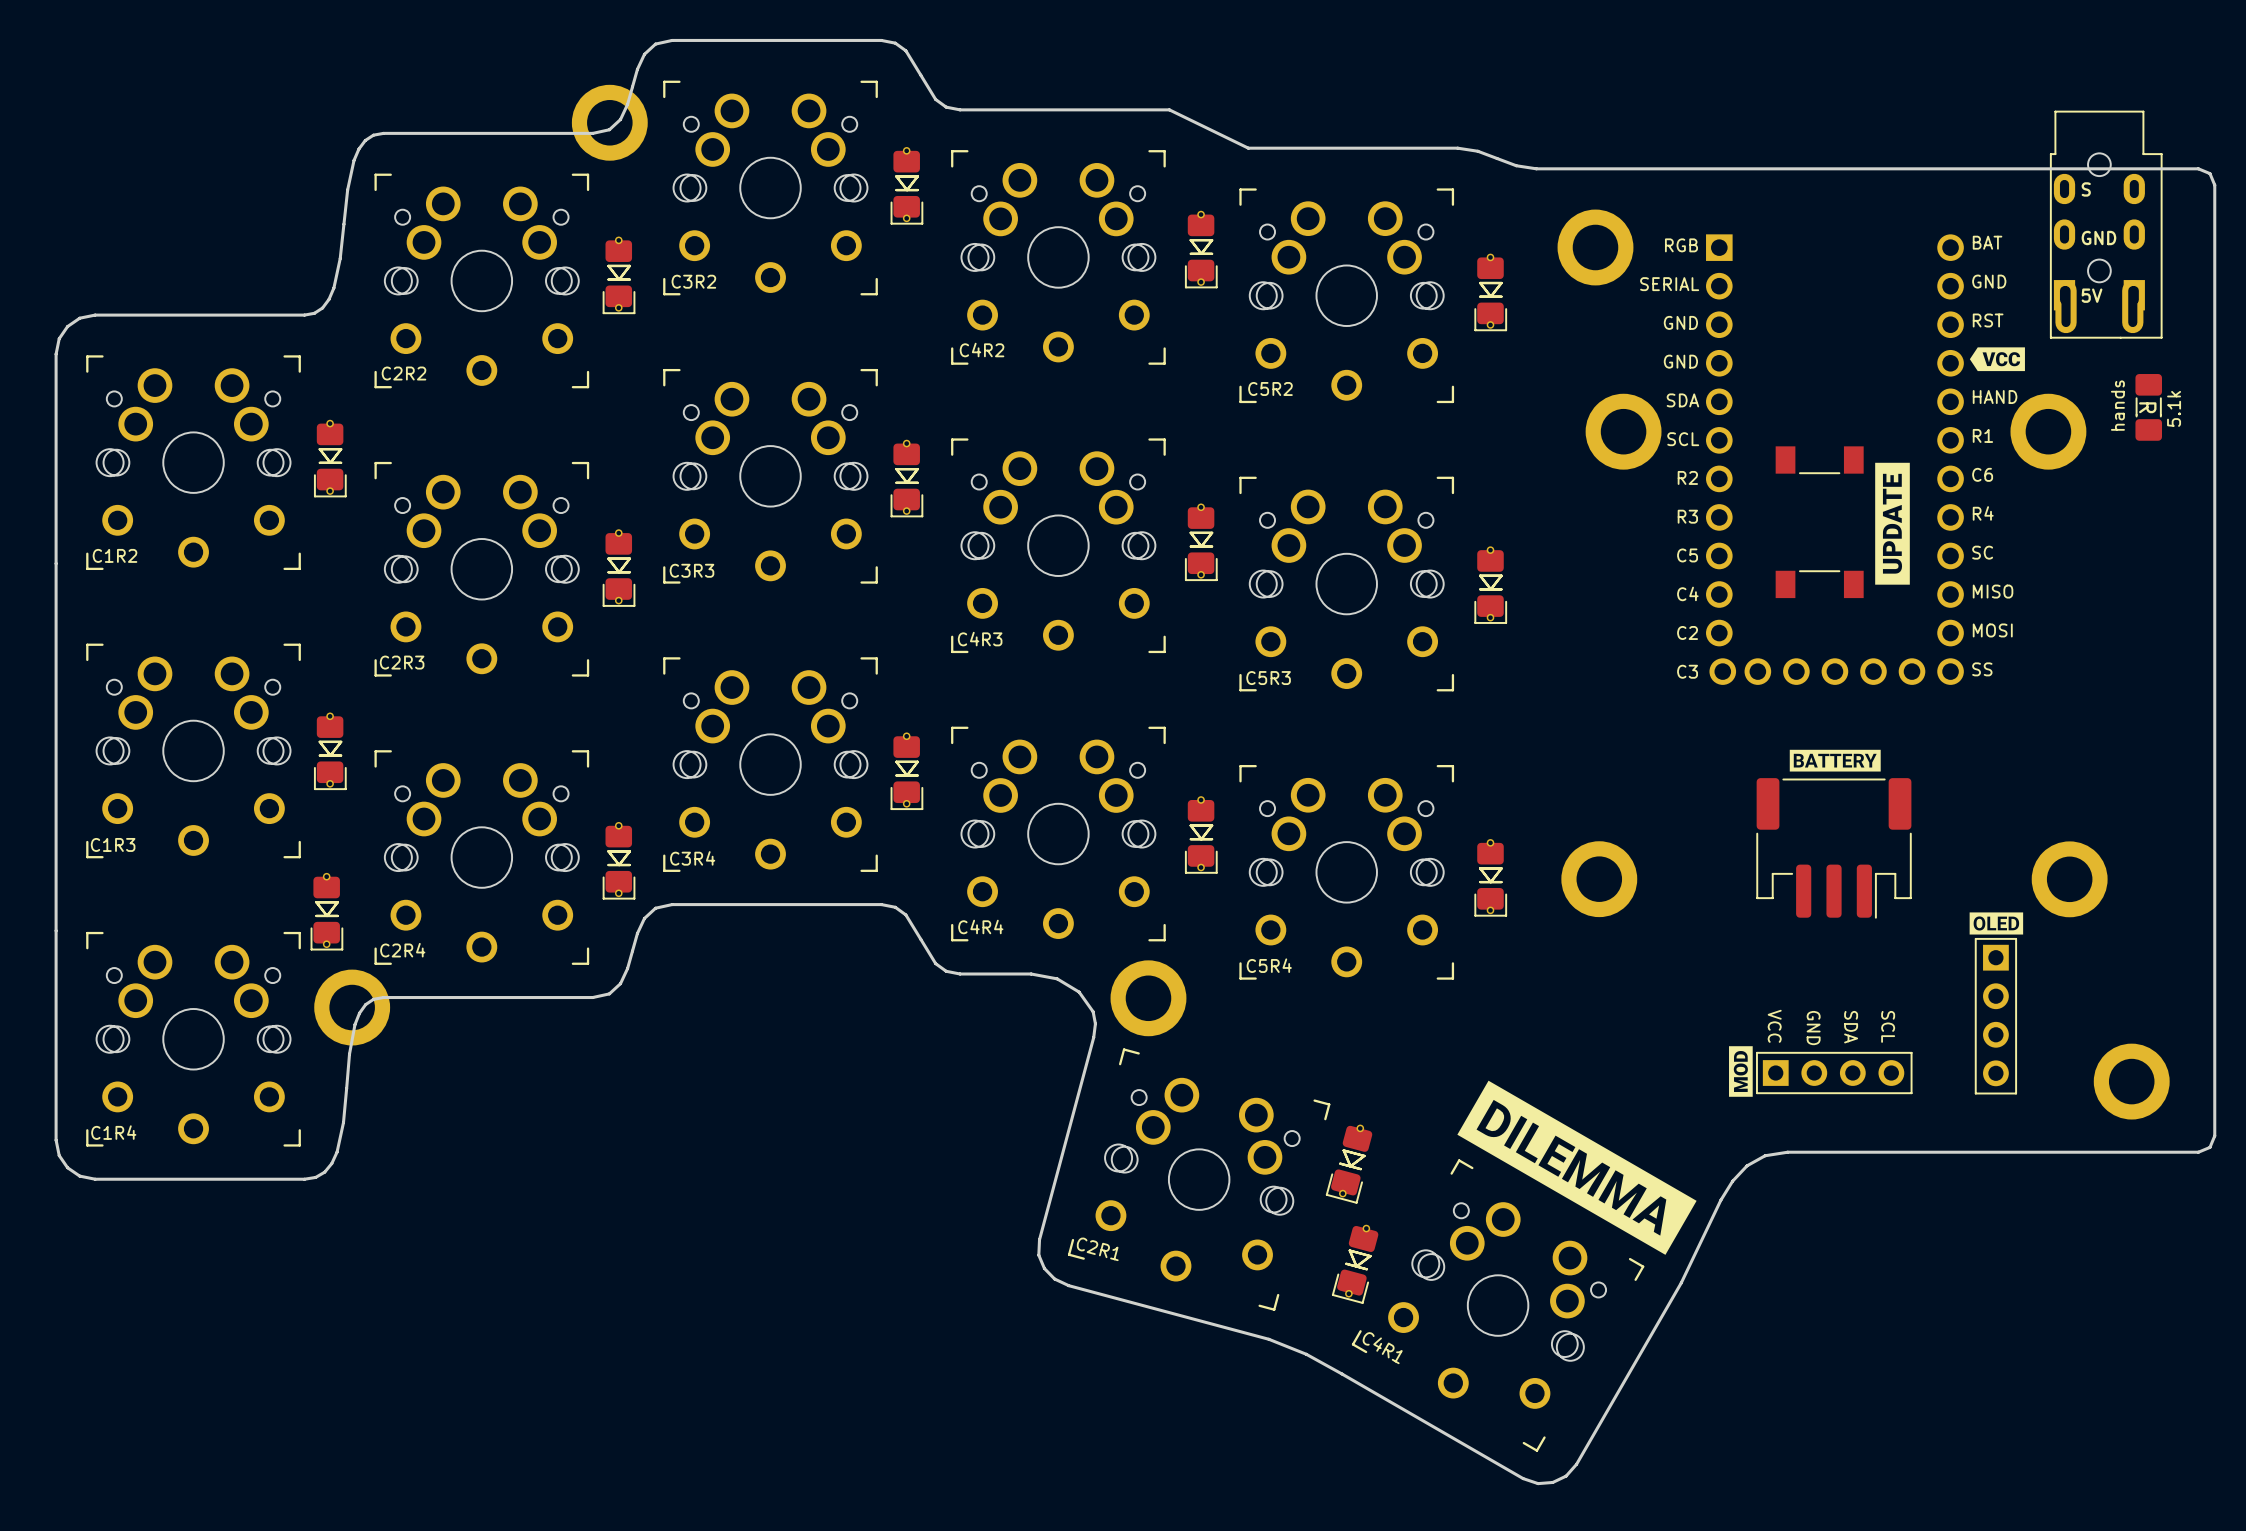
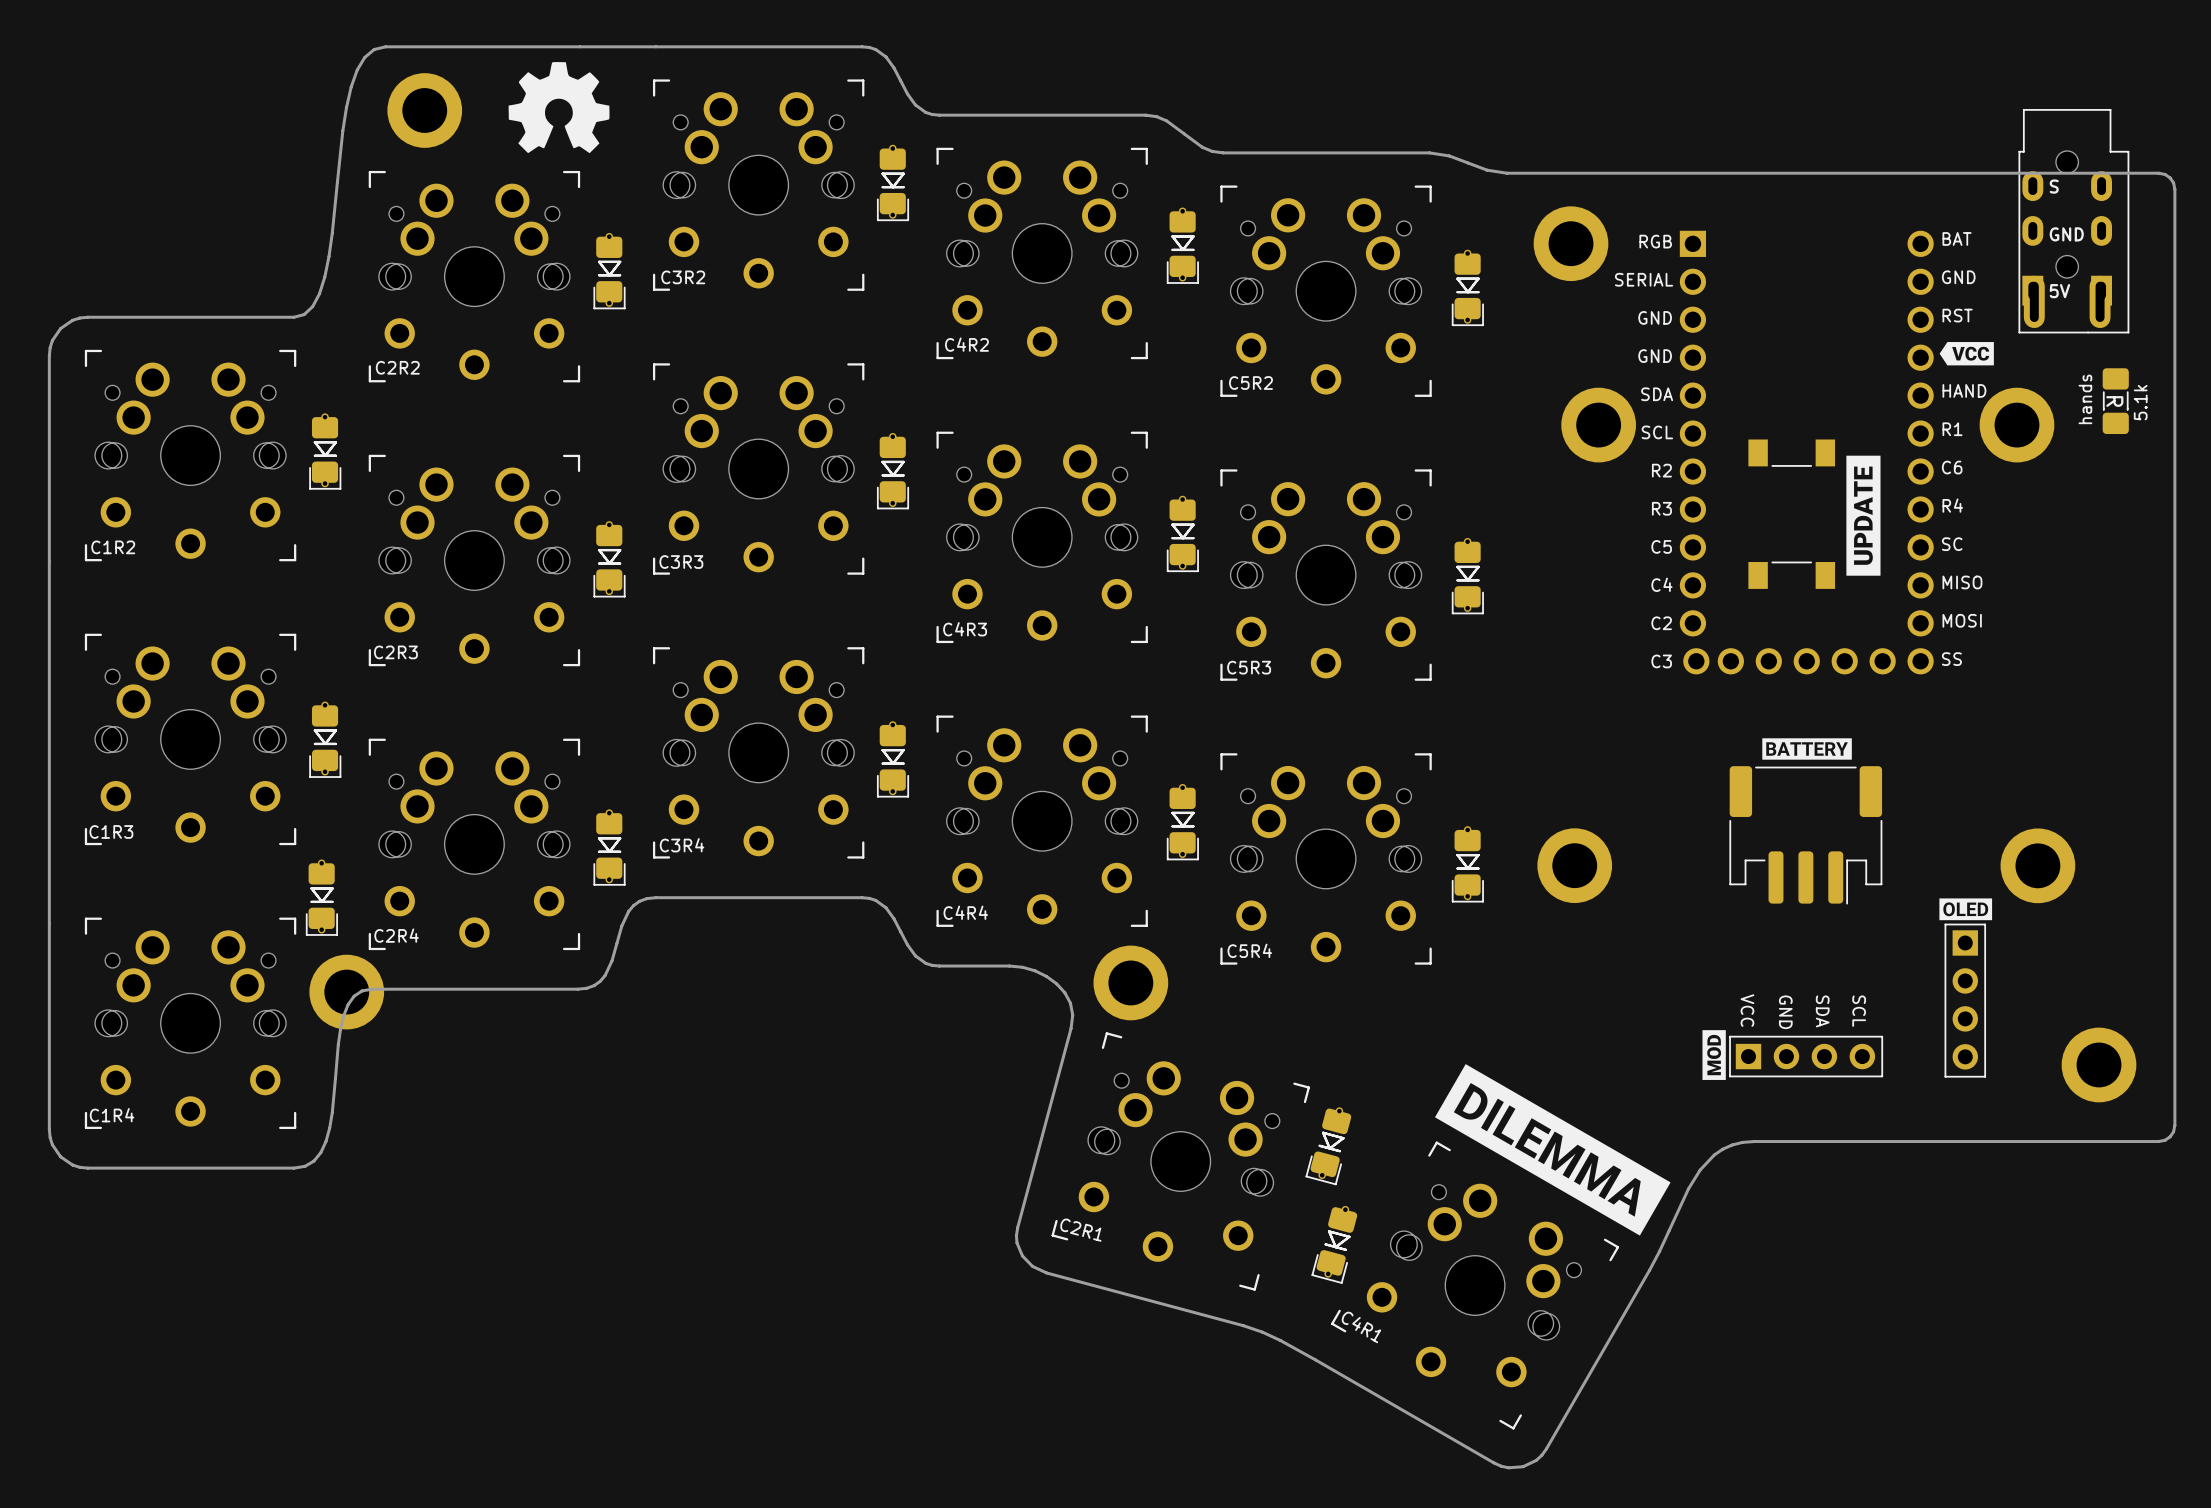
board edge: (672, 40) (655, 44) (644, 54) (637, 69) (627, 104) (620, 119) (609, 129) (592, 133) (383, 133) (373, 135) (365, 140) (354, 160) (347, 189) (340, 258) (333, 288) (322, 307) (314, 313) (304, 315) (95, 315) (79, 318) (67, 326) (59, 338) (56, 354) (56, 1140) (59, 1155) (67, 1167) (79, 1176) (95, 1179) (304, 1179) (315, 1177) (324, 1172) (331, 1163) (337, 1152) (343, 1122) (349, 1054) (354, 1024) (365, 1004) (373, 999) (383, 997) (592, 997) (609, 993) (620, 983) (627, 968) (637, 933) (644, 918) (655, 908) (672, 904) (881, 904) (895, 907) (905, 914) (935, 963) (946, 971) (960, 974) (1031, 974) (1057, 978) (1079, 992) (1093, 1011) (1095, 1023) (1093, 1037) (1039, 1239) (1038, 1255) (1044, 1268) (1054, 1279) (1068, 1285) (1268, 1339) (1306, 1354) (1523, 1478) (1538, 1483) (1552, 1482) (1566, 1476) (1576, 1464) (1681, 1282) (1720, 1200) (1732, 1181) (1747, 1165) (1765, 1155) (1787, 1152) (2198, 1152) (2209, 1147) (2214, 1135) (2214, 185) (2209, 173) (2198, 168) (1536, 168) (1516, 165) (1477, 151) (1457, 148) (1248, 148) (1169, 109) (960, 109) (946, 107) (935, 99) (905, 50) (895, 43) (881, 40) (672, 40) -> (385, 46) (374, 49) (364, 57) (357, 70) (351, 87) (342, 130) (332, 233) (324, 276) (312, 306) (304, 314) (294, 317) (79, 318) (60, 328) (50, 347) (49, 1129) (52, 1144) (60, 1156) (72, 1165) (87, 1168) (294, 1168) (305, 1166) (313, 1161) (326, 1141) (332, 1112) (338, 1044) (343, 1015) (354, 996) (361, 990) (371, 989) (586, 988) (594, 985) (605, 975) (628, 911) (639, 901) (647, 898) (869, 898) (886, 907) (907, 944) (915, 955) (925, 963) (939, 966) (1022, 967) (1035, 970) (1056, 983) (1070, 1003) (1072, 1015) (1071, 1028) (1016, 1235) (1016, 1242) (1022, 1256) (1032, 1266) (1046, 1272) (1262, 1332) (1315, 1359) (1493, 1462) (1508, 1467) (1523, 1466) (1536, 1460) (1546, 1448) (1649, 1270) (1688, 1188) (1700, 1170) (1722, 1149) (1742, 1142) (1754, 1141) (2158, 1141) (2165, 1140) (2173, 1131) (2174, 189) (2173, 182) (2165, 174) (1506, 173) (1487, 170) (1449, 155) (1429, 152) (1223, 152) (1202, 147) (1166, 120) (1145, 115) (932, 114) (915, 104) (886, 57) (869, 47) (385, 46)
drawing: none -> [508, 62, 610, 154]
part position: (609, 122) -> (424, 110)

